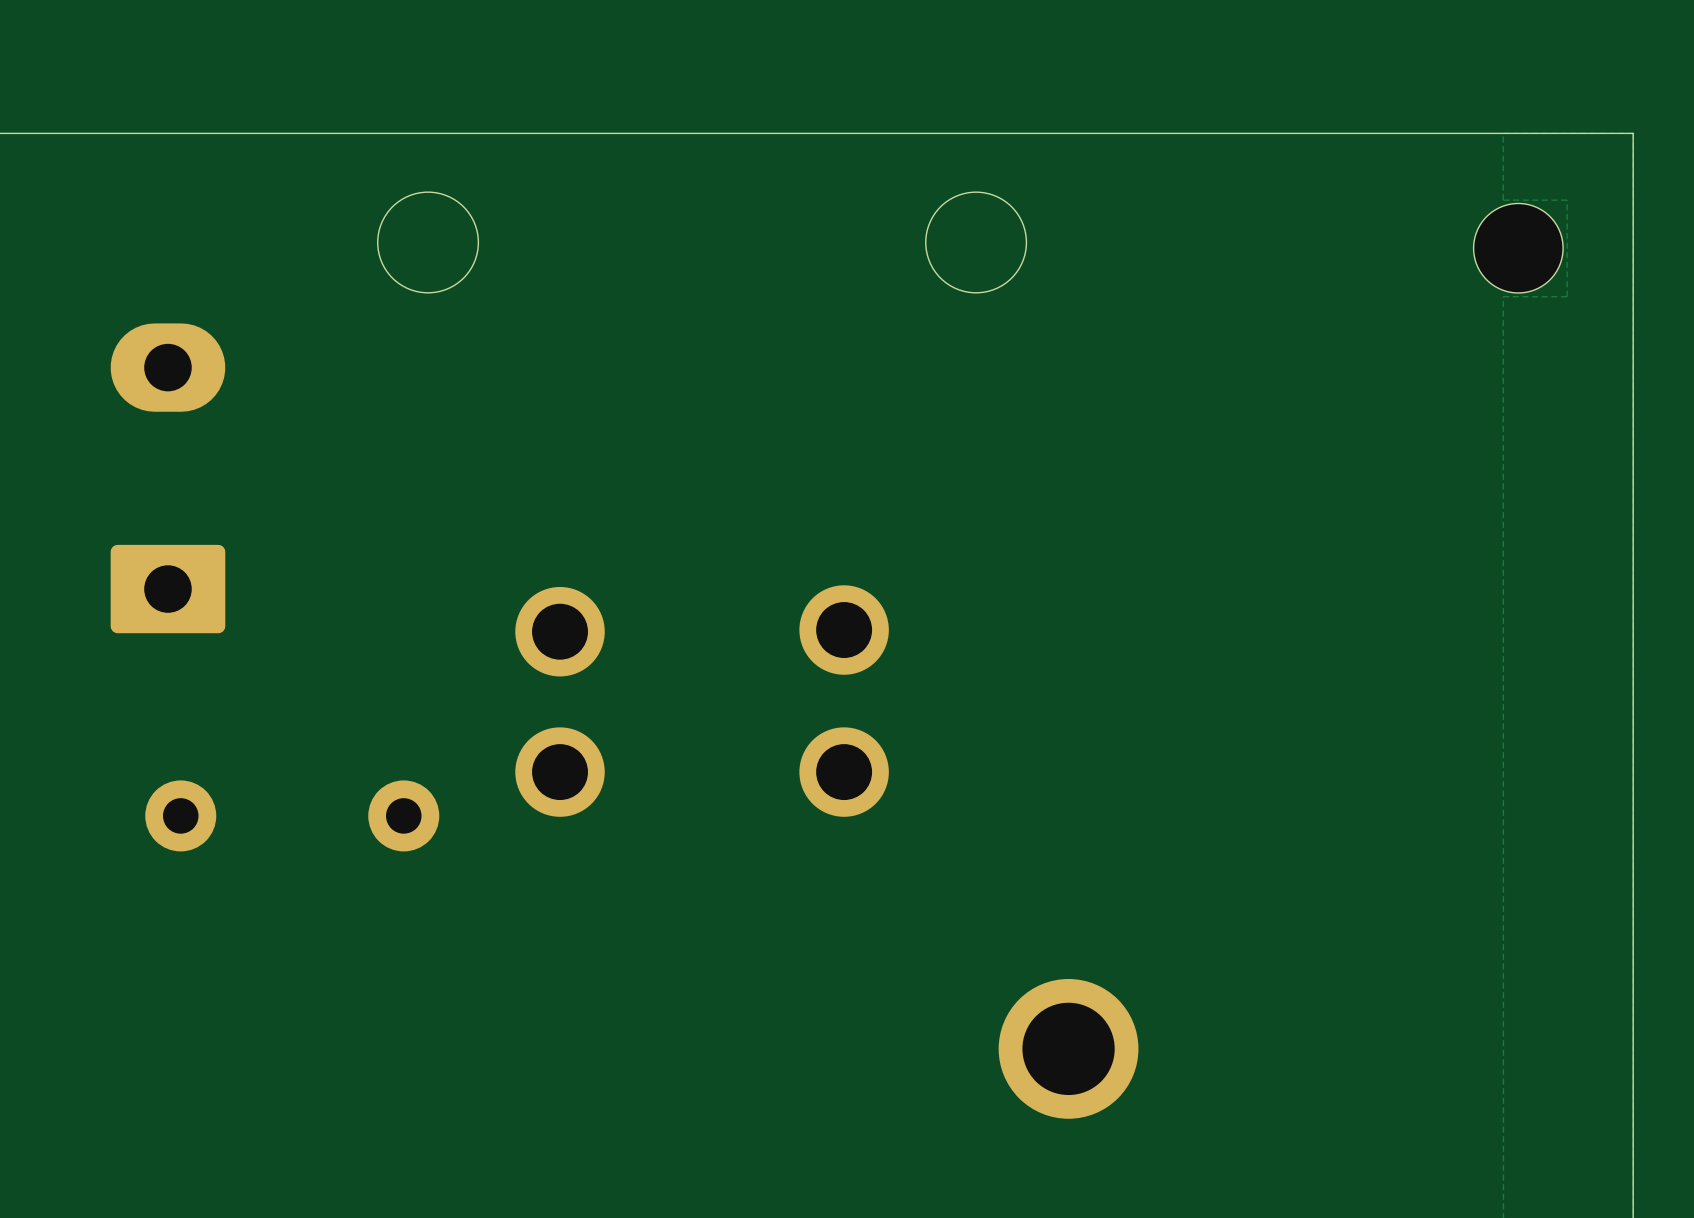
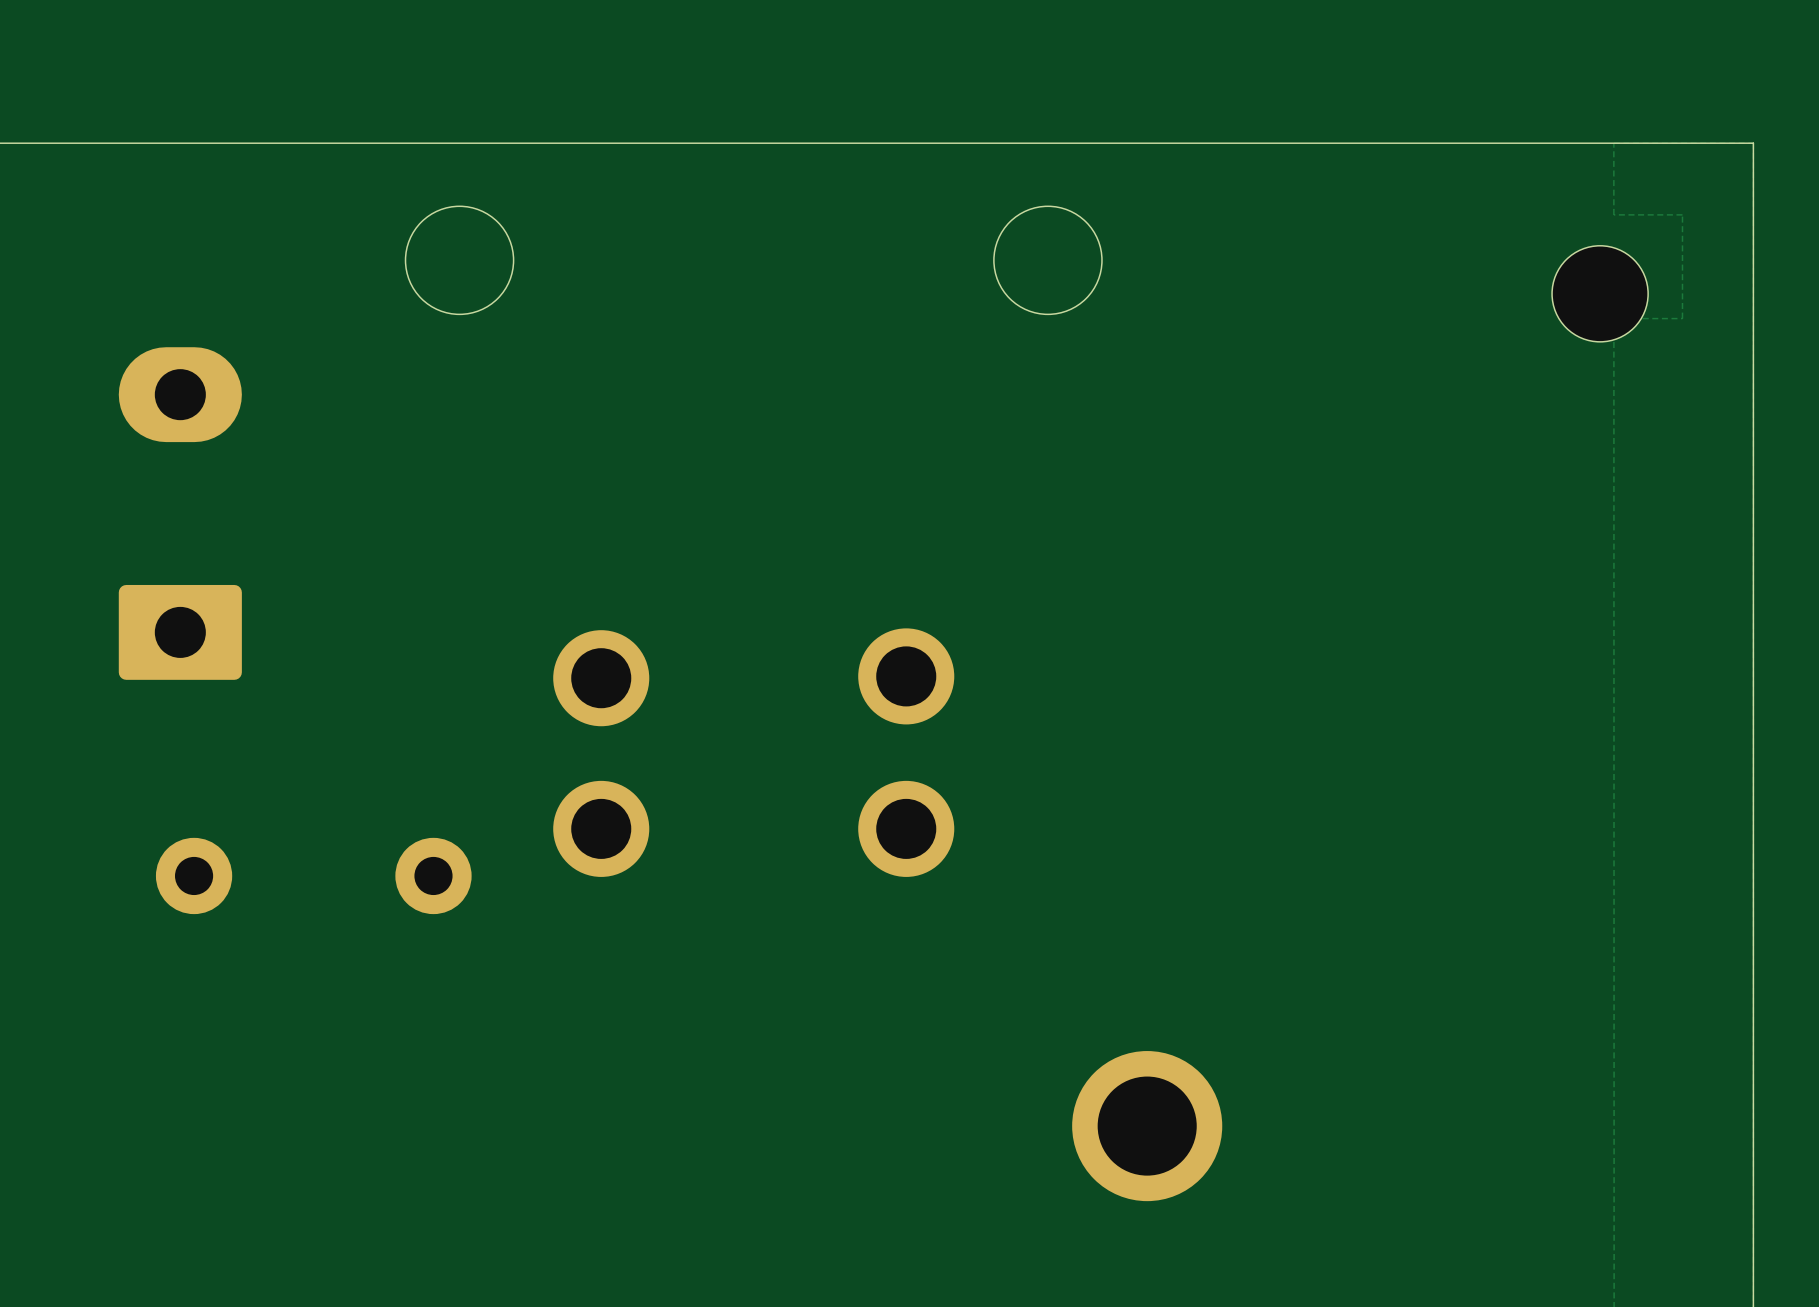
part position: (1518, 248) -> (1600, 293)

